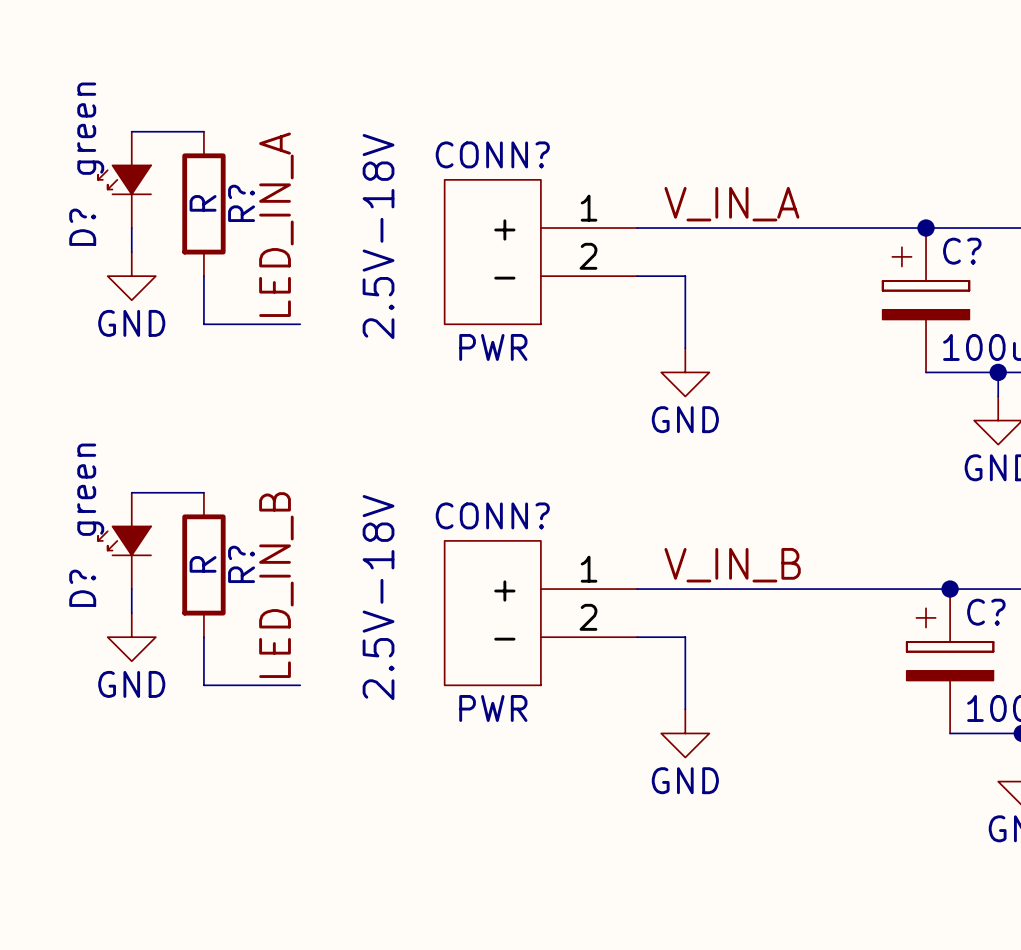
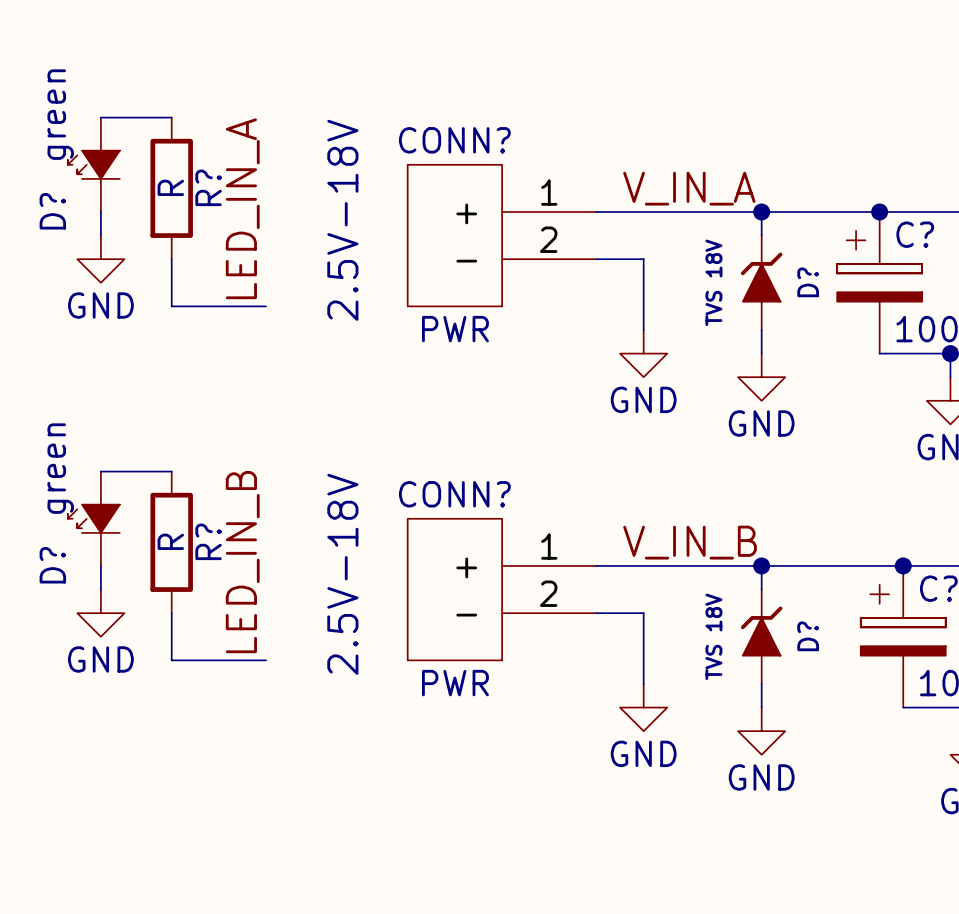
wire: none -> (761, 211) (761, 235)
junction: none -> (761, 211)
D?: none -> TVS 18V (761, 282)
wire: none -> (761, 329) (761, 353)
power symbol: none -> GND (761, 377)
wire: none -> (761, 565) (761, 589)
junction: none -> (761, 565)
D?: none -> TVS 18V (761, 636)
wire: none -> (761, 683) (761, 707)
power symbol: none -> GND (761, 731)

